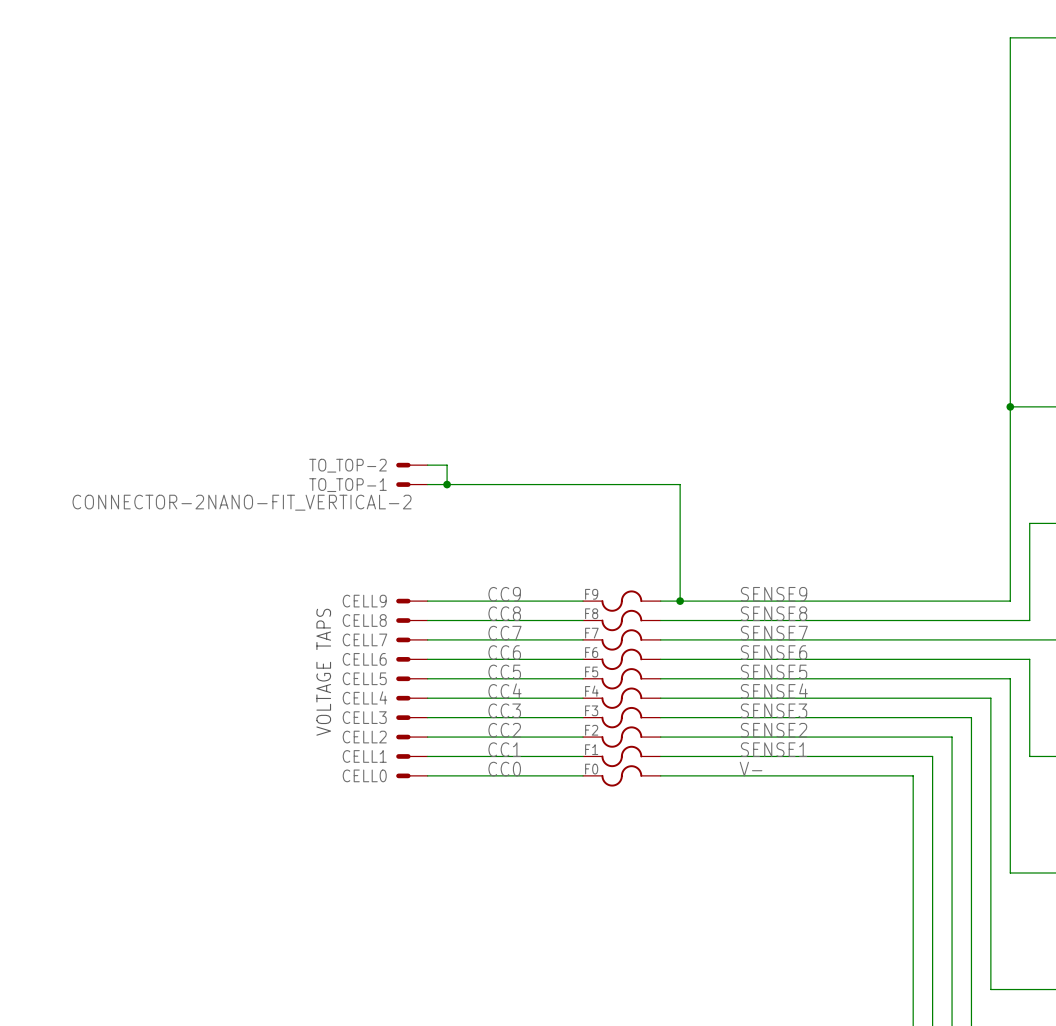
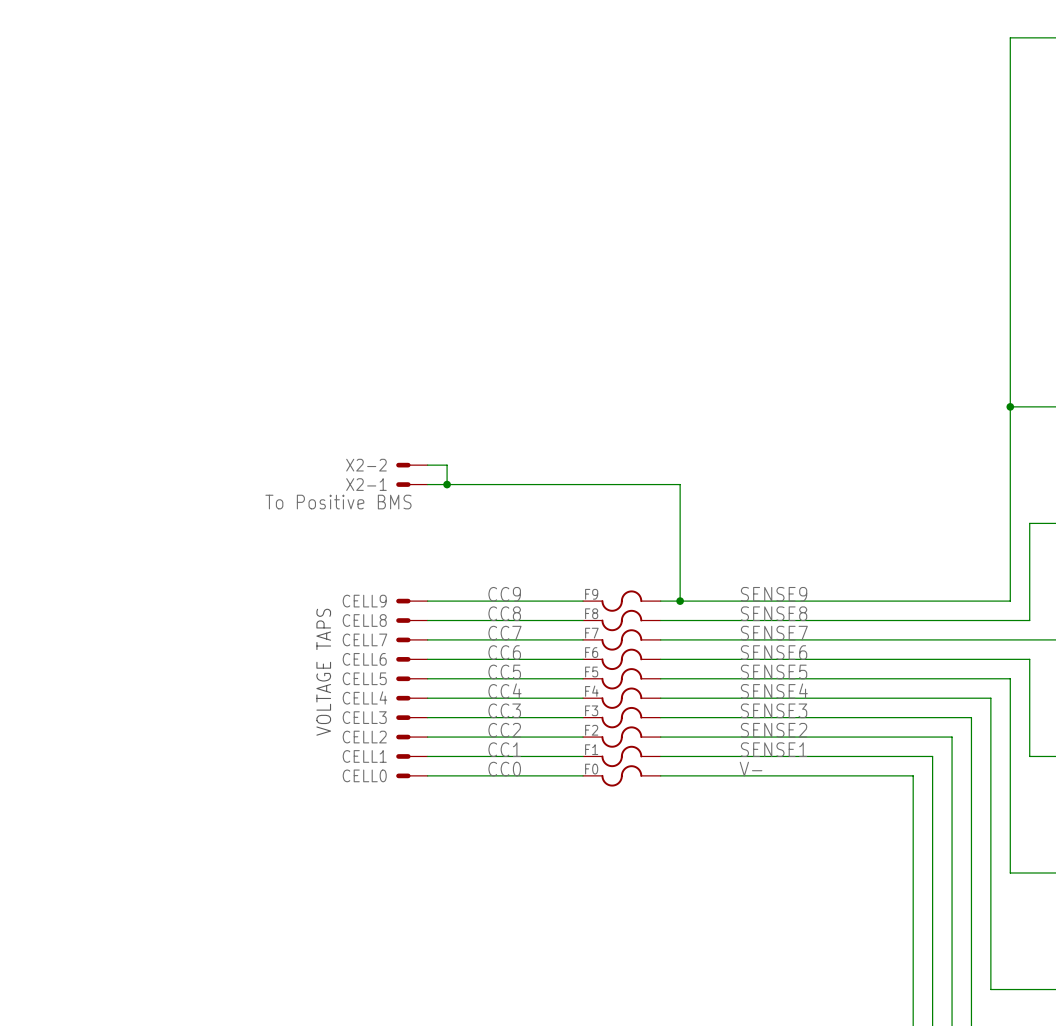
TO_TOP-2 name: TO_TOP-2 (347, 465) -> X2-2 (366, 465)
TO_TOP-1 name: TO_TOP-1 (347, 485) -> X2-1 (366, 484)
TO_TOP-1 value: CONNECTOR-2NANO-FIT_VERTICAL-2 (242, 502) -> To Positive BMS (338, 502)

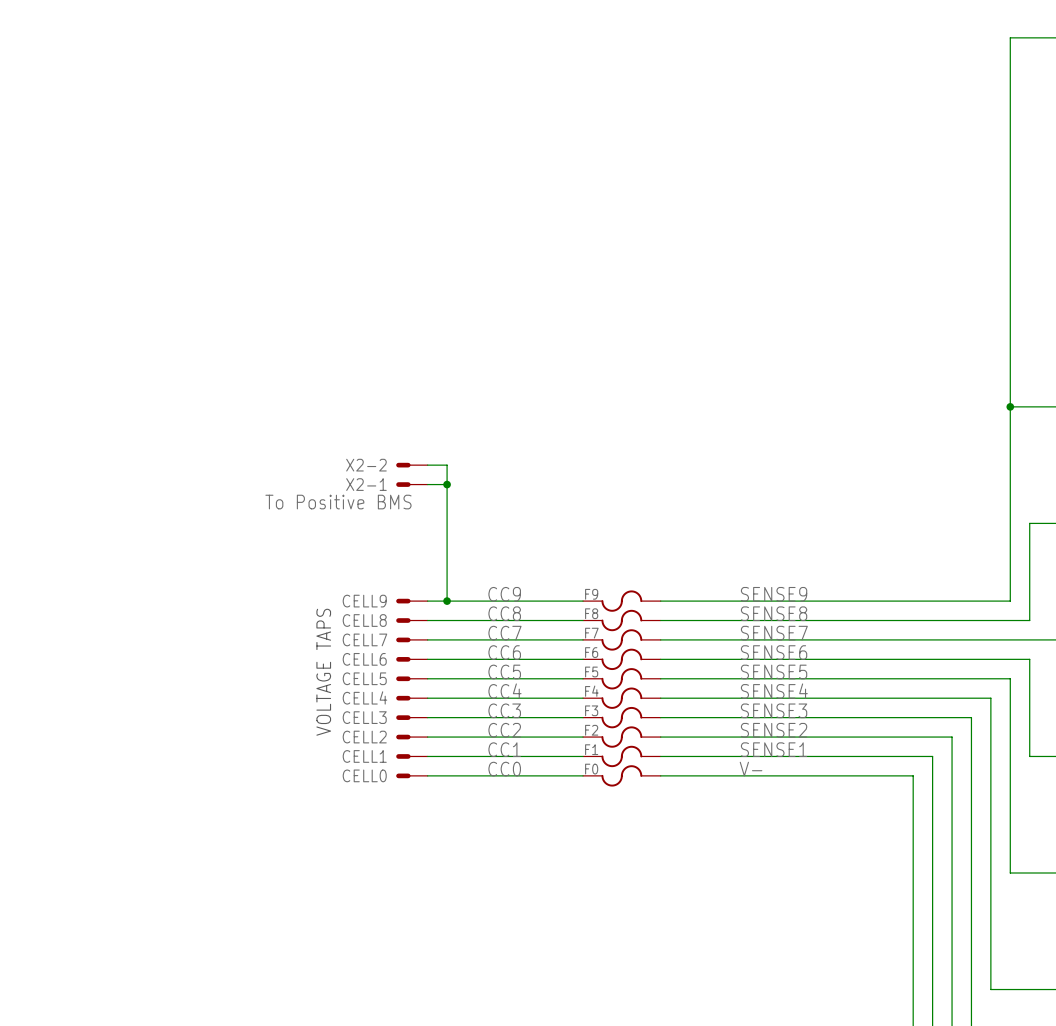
wire: (447, 484) (680, 484) (680, 601) -> (447, 484) (447, 601)
junction: none -> (447, 601)
junction: (680, 601) -> none

